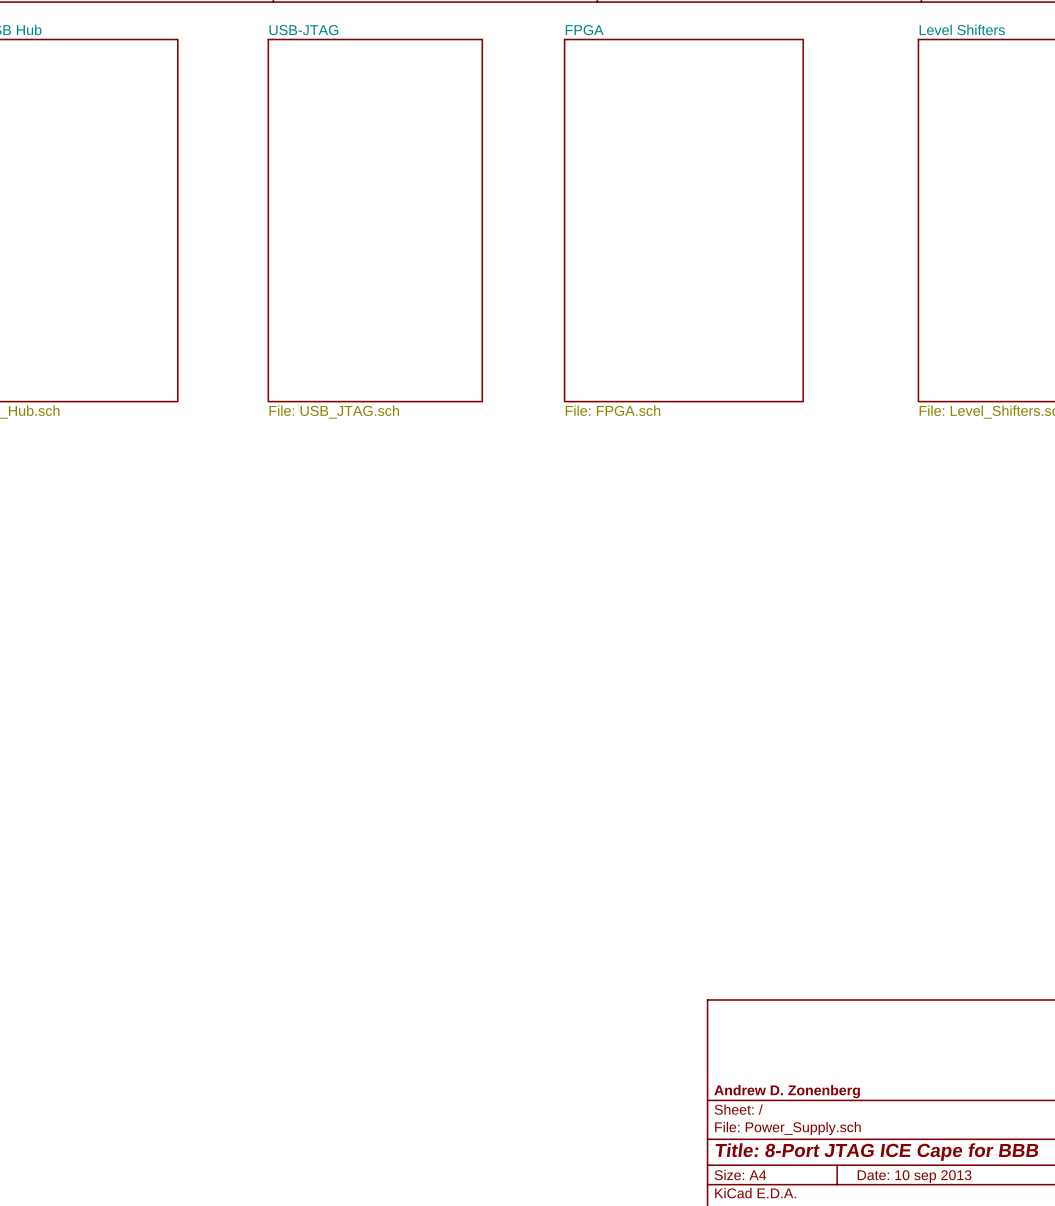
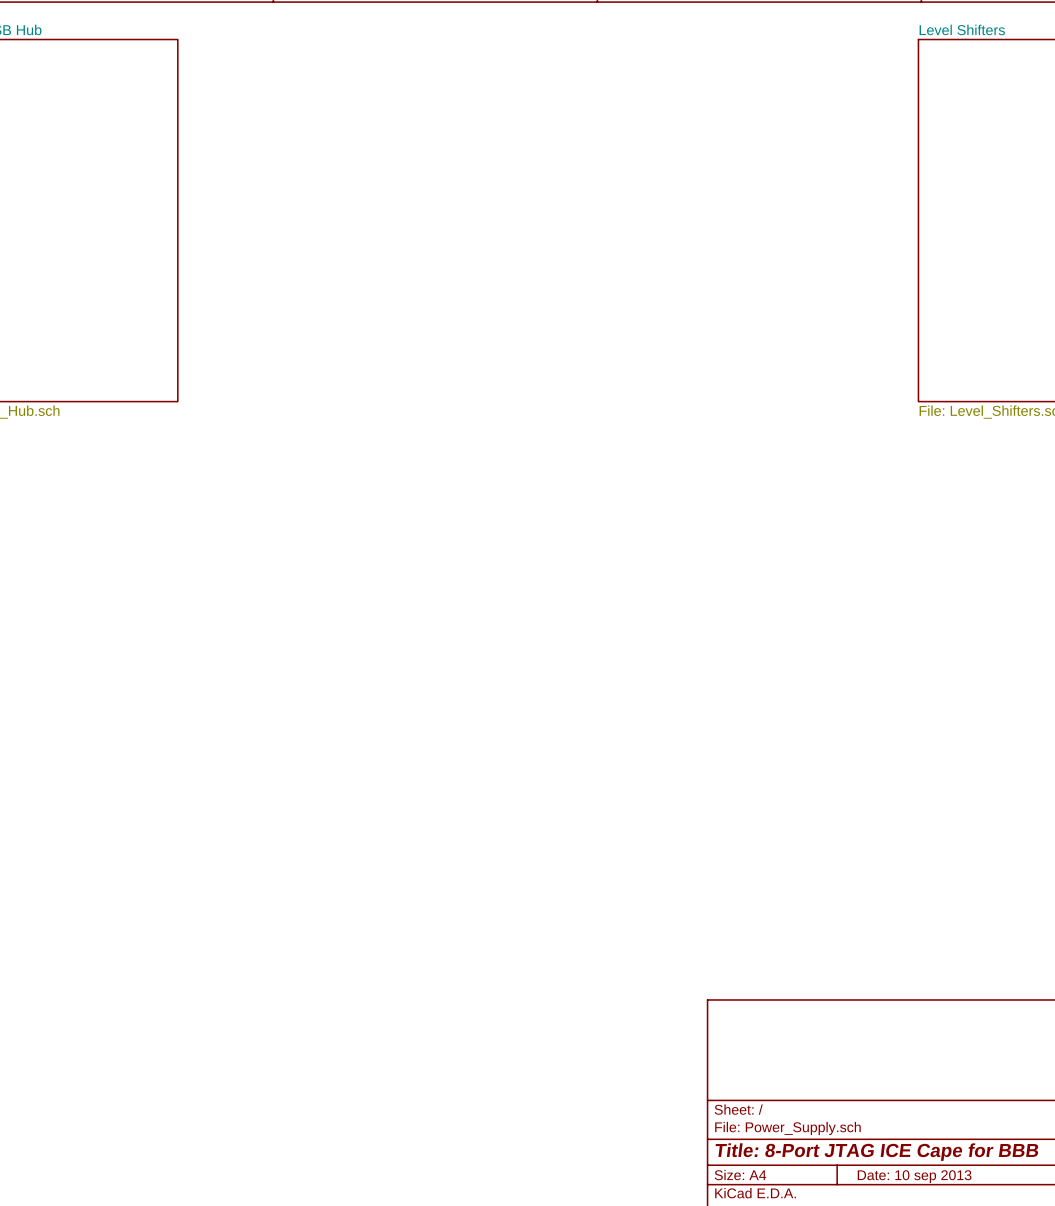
sheet USB-JTAG: File: USB_JTAG.sch (375, 220) -> none
sheet FPGA: File: FPGA.sch (683, 220) -> none
title block: Andrew D. Zonenberg (787, 1091) -> none

